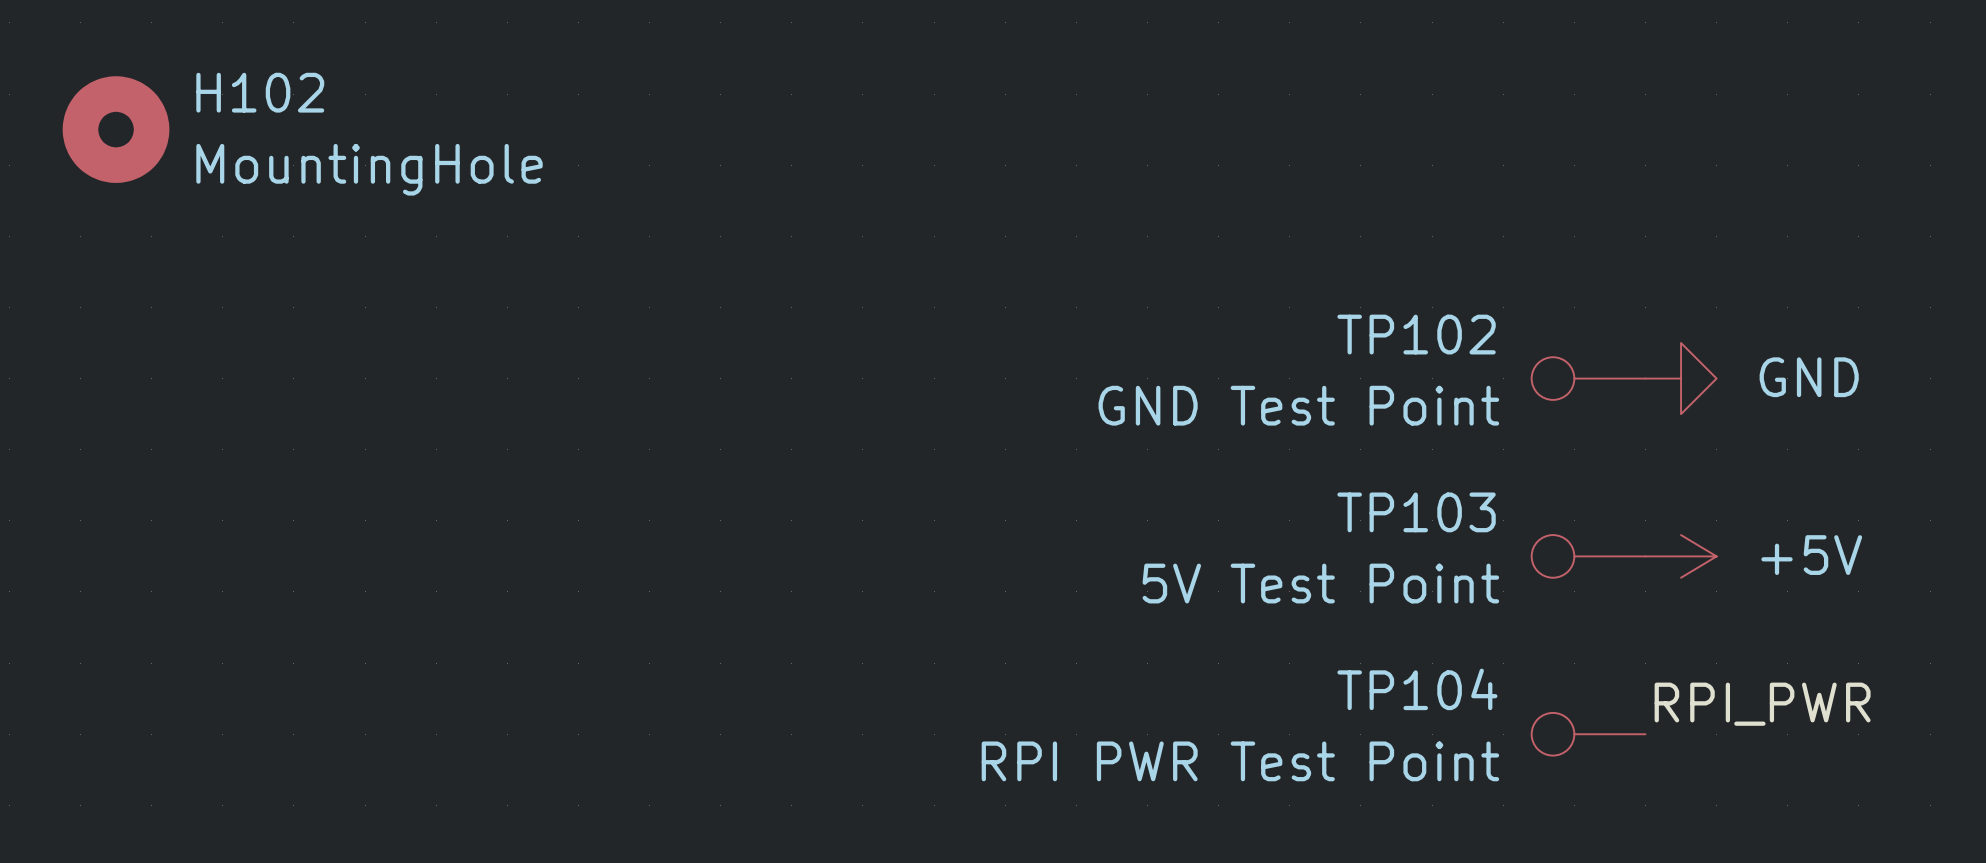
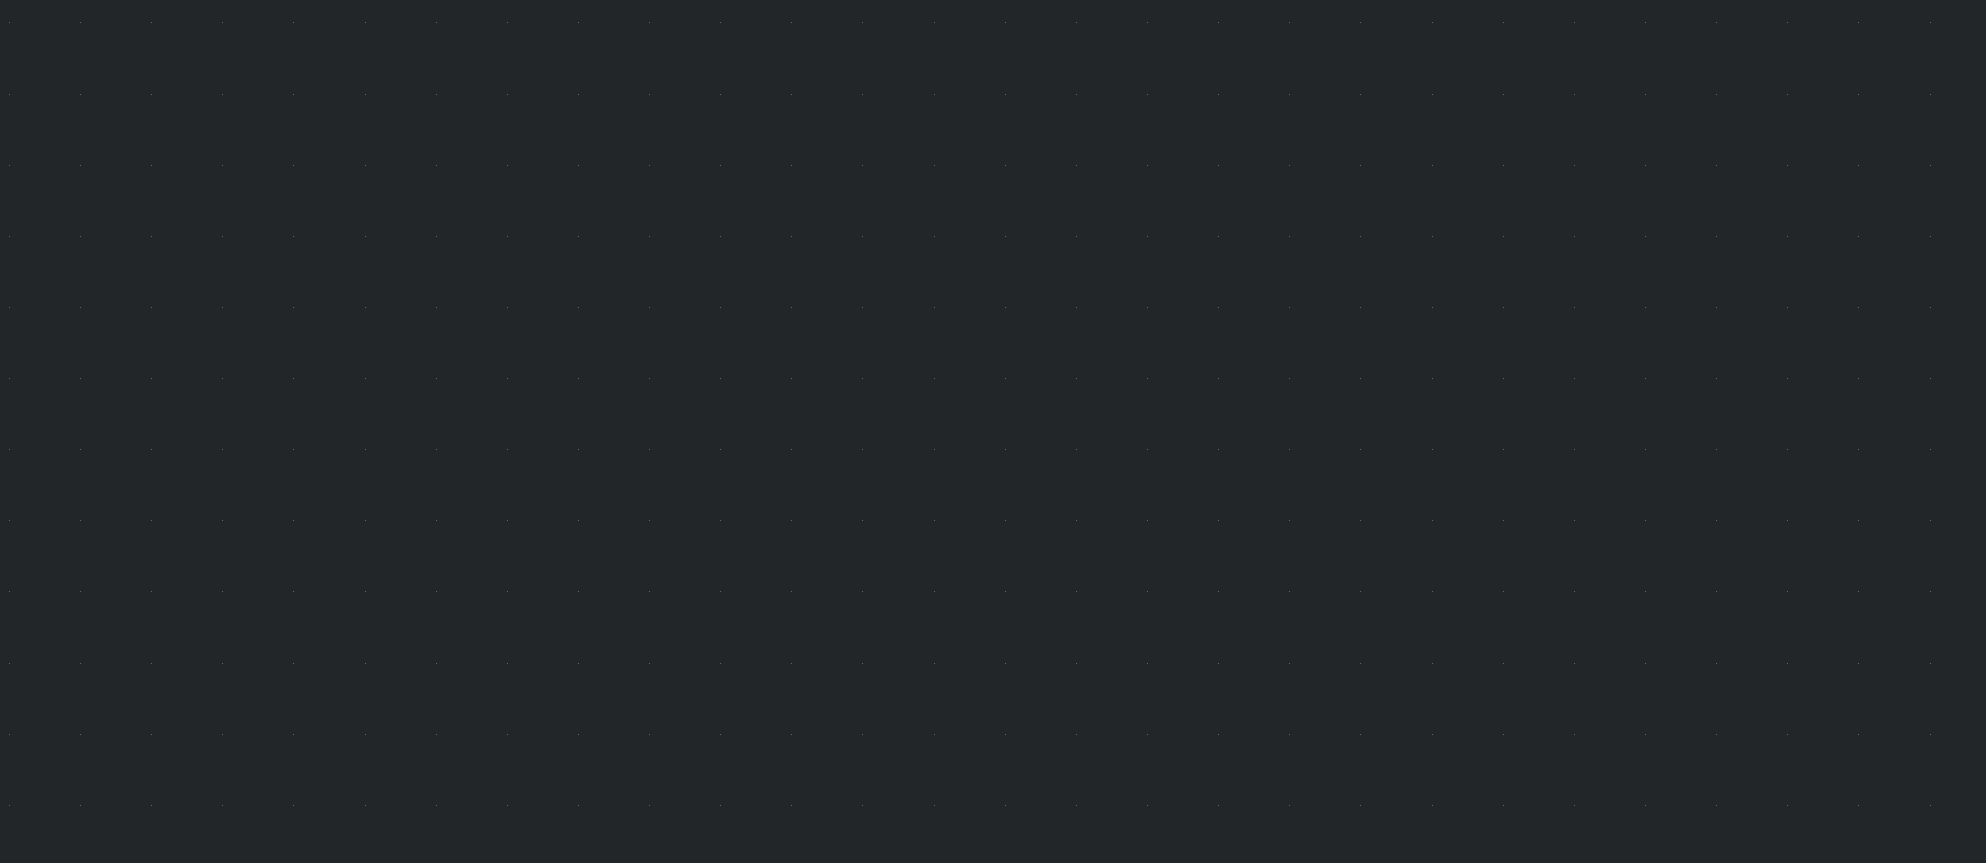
H102: MountingHole (116, 129) -> none
TP102: GND Test Point (1588, 378) -> none
power symbol: GND (1681, 378) -> none
TP103: 5V Test Point (1588, 556) -> none
power symbol: +5V (1681, 556) -> none
label: RPI_PWR (1762, 704) -> none
TP104: RPI PWR Test Point (1588, 734) -> none

